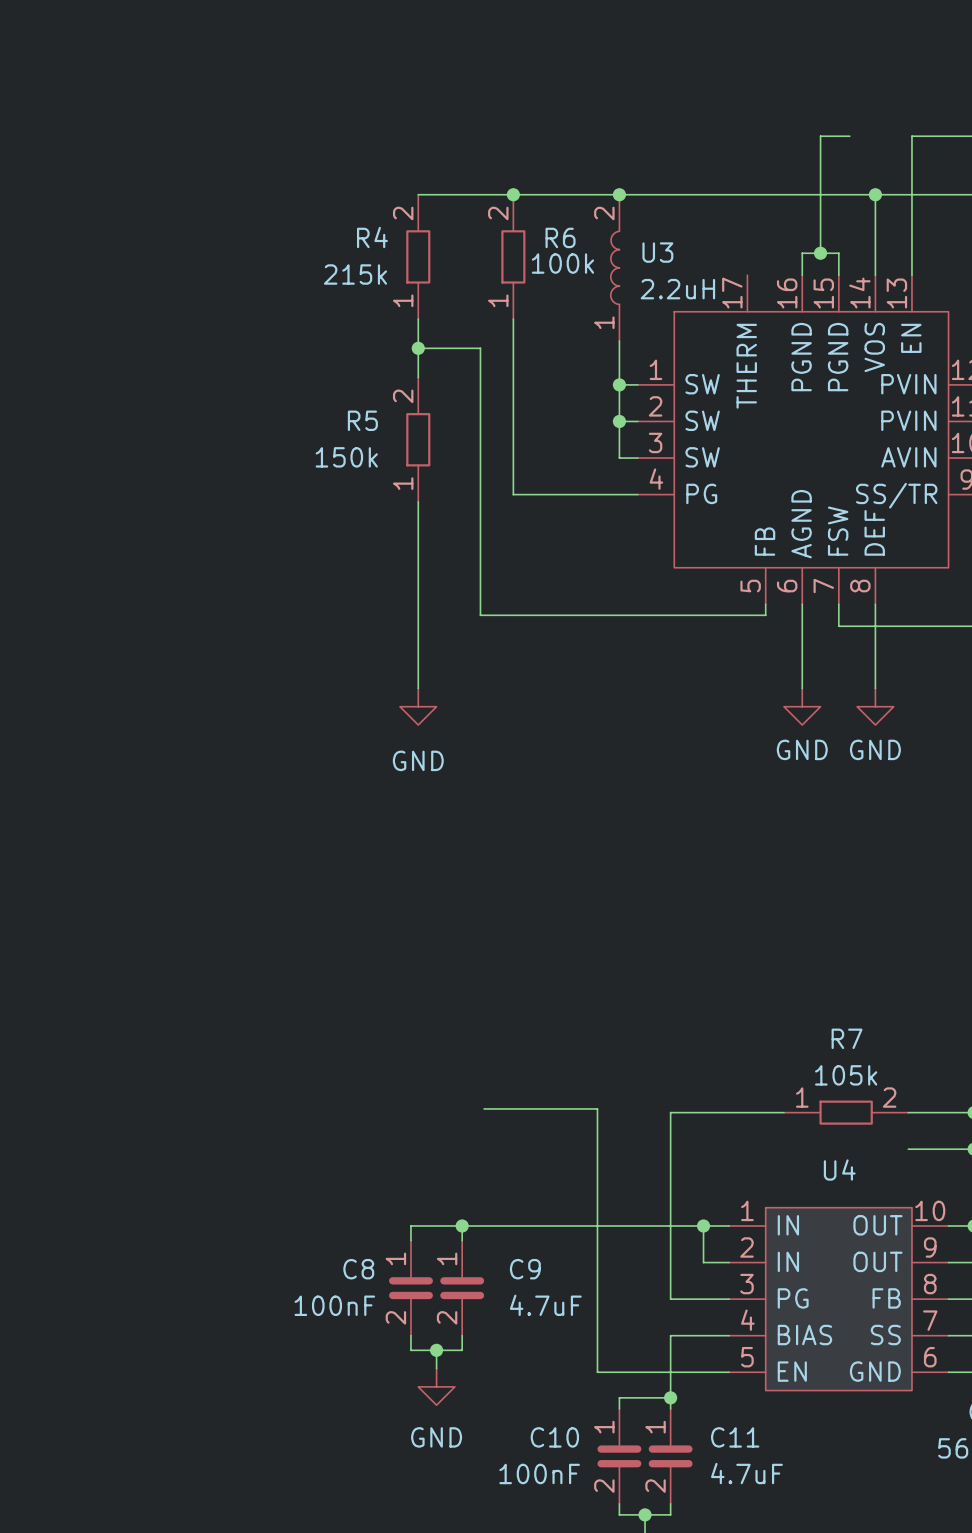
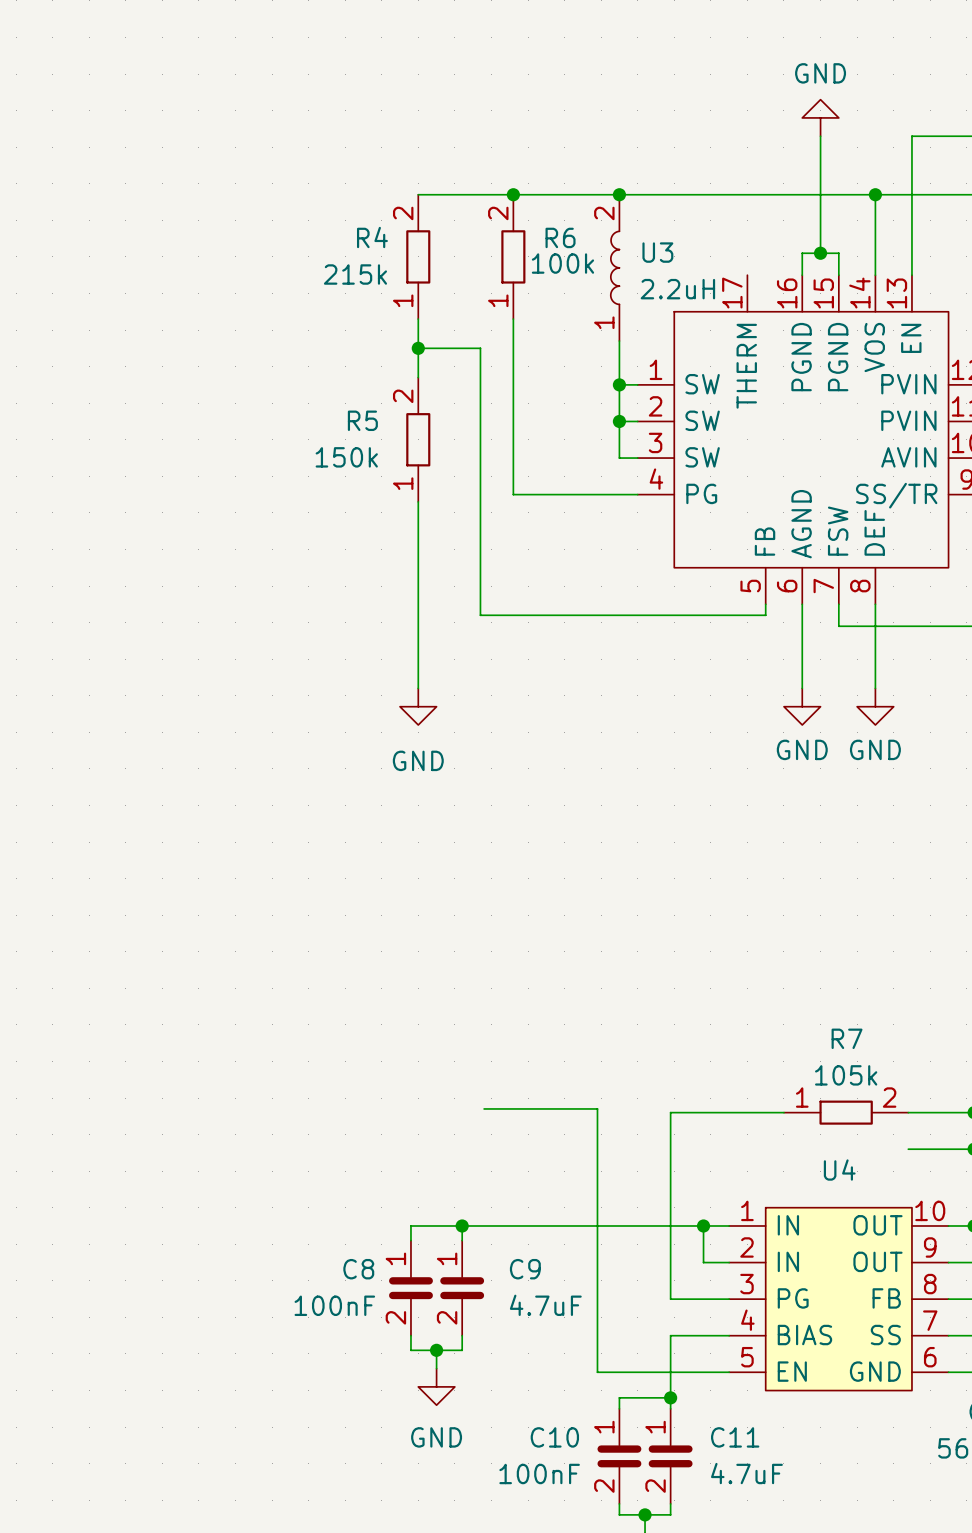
power symbol: none -> GND (820, 117)
wire: (820, 136) (849, 136) -> none

